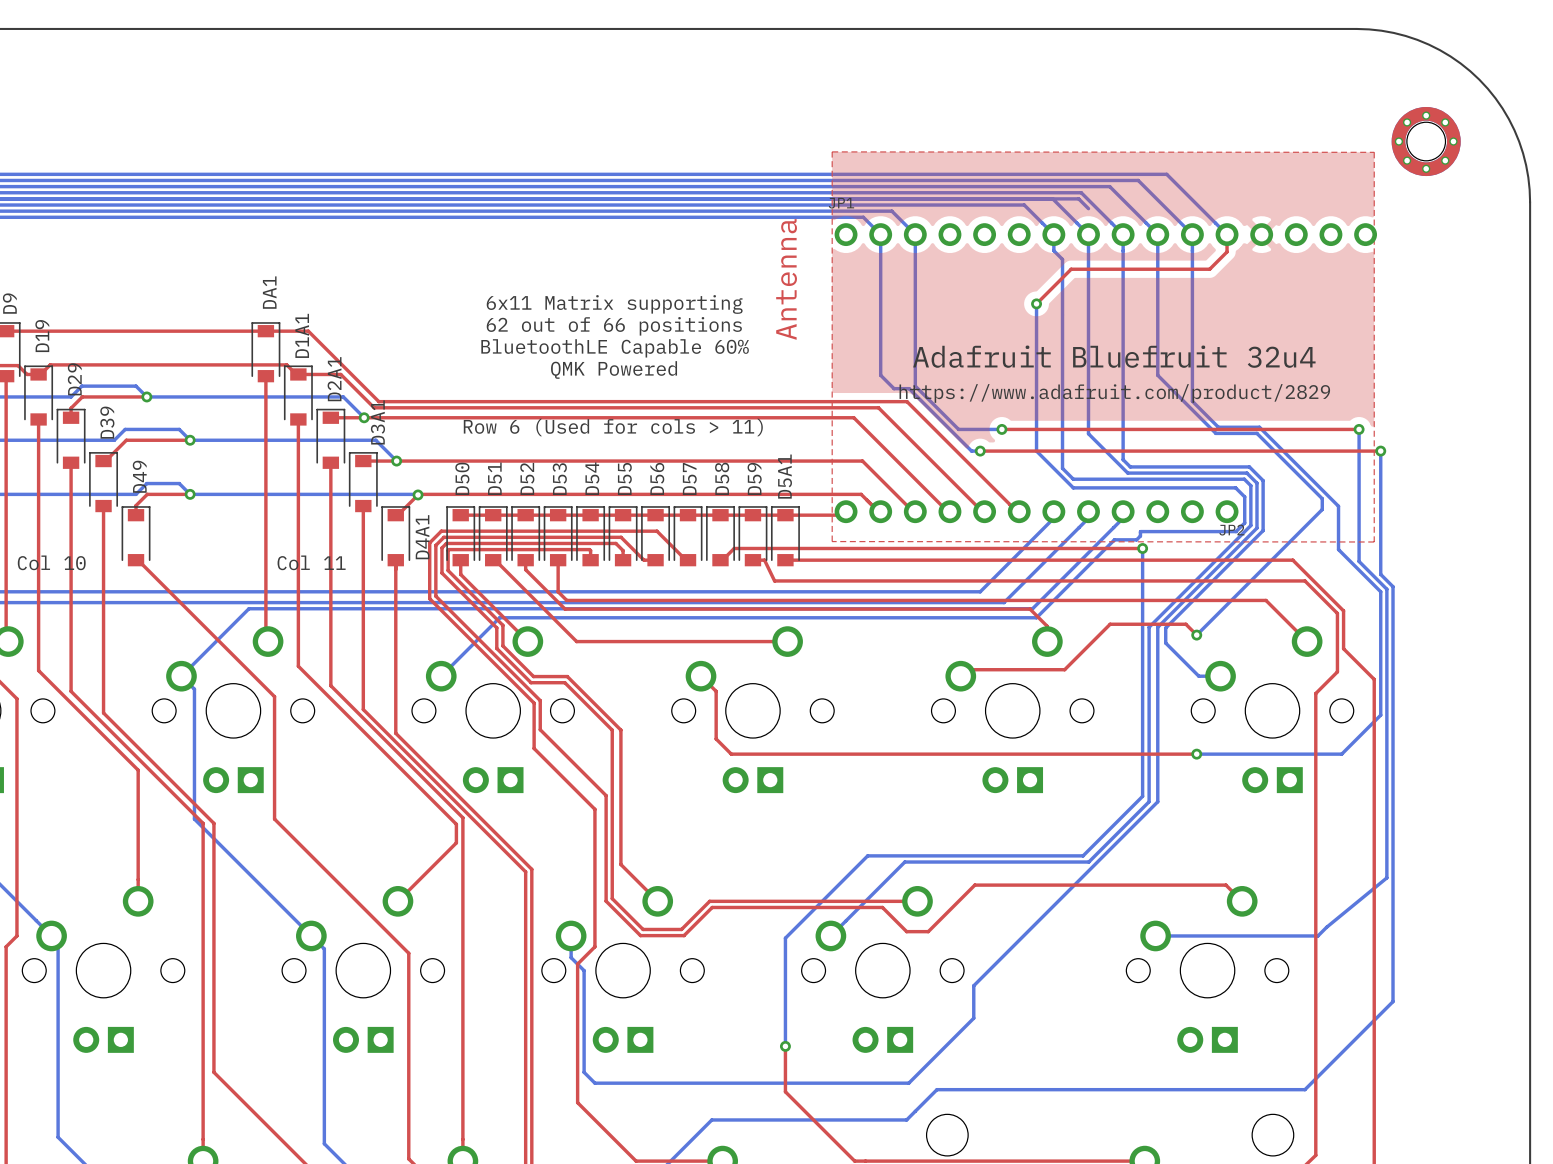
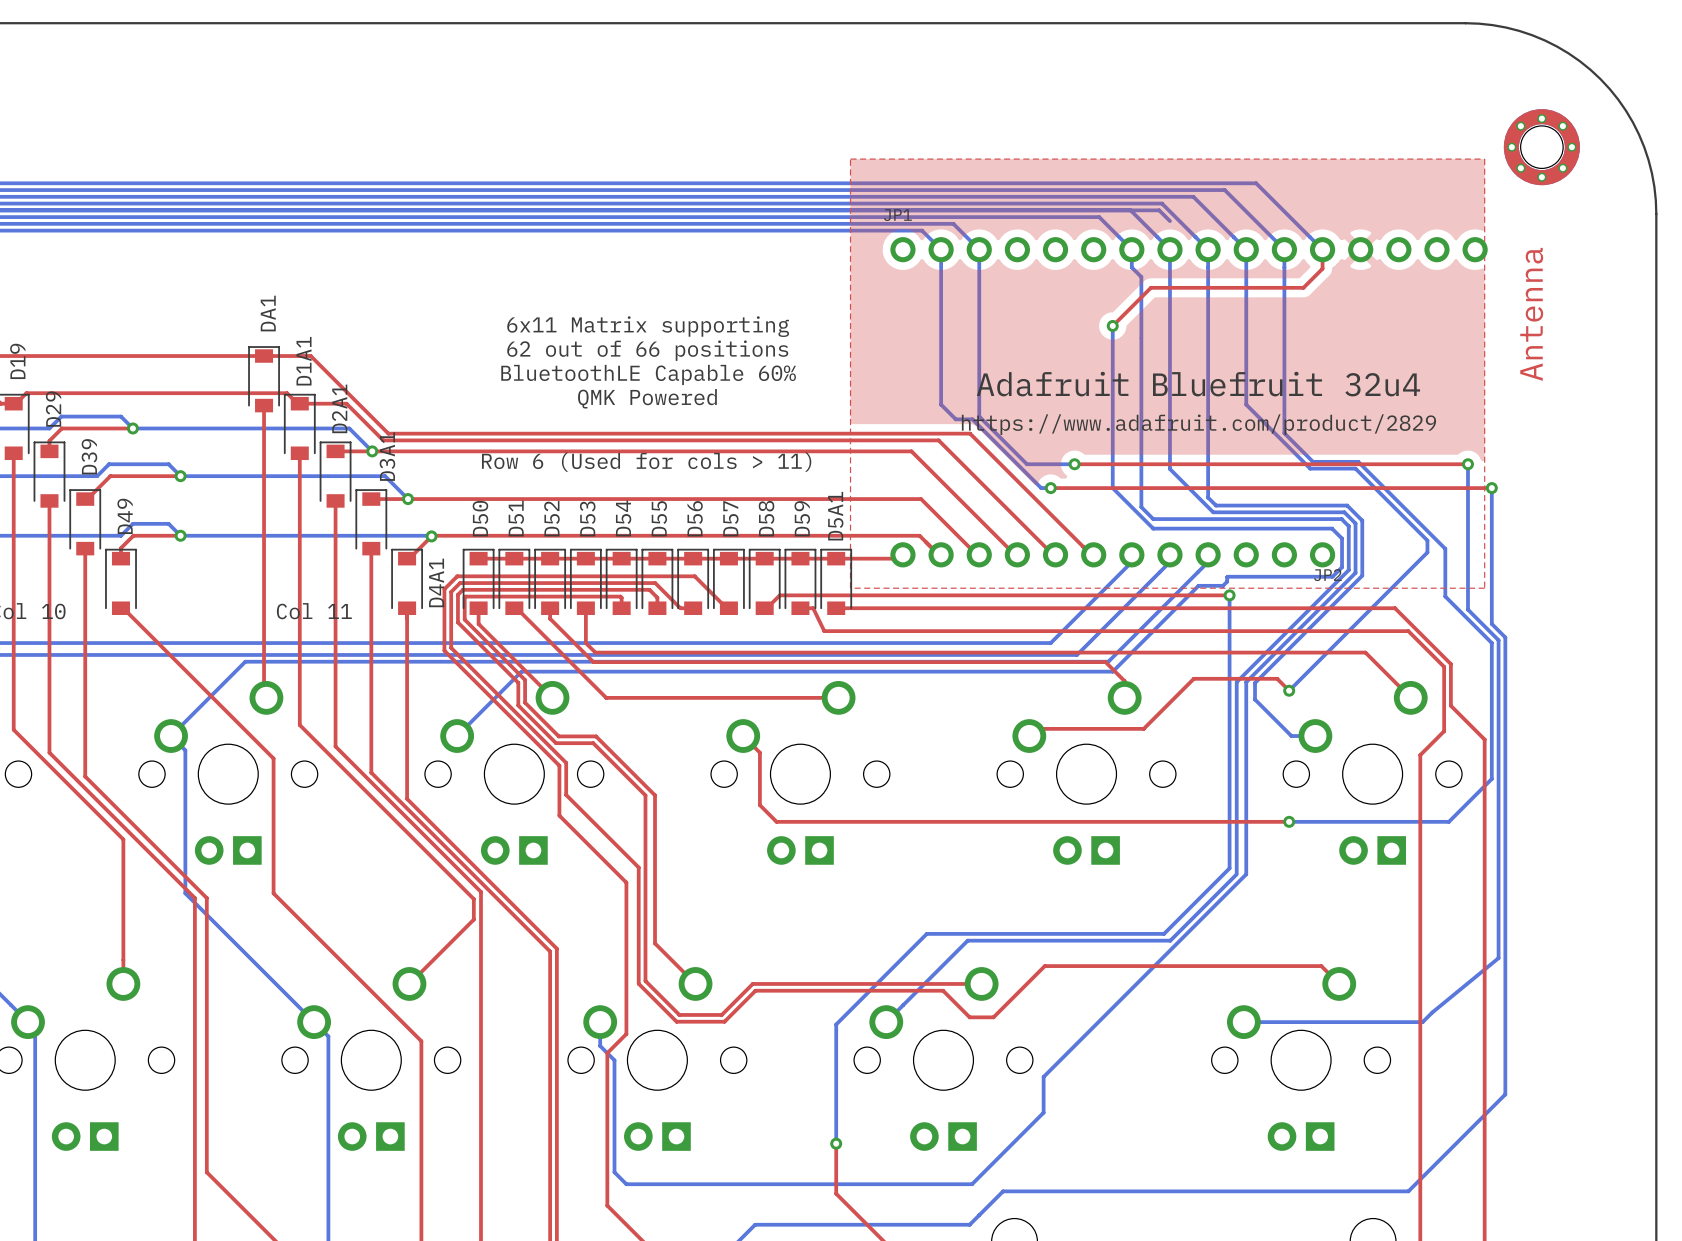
top zone outline: (1374, 152) (832, 151) (832, 541) (1374, 542) -> (1484, 159) (850, 159) (850, 588) (1484, 588)
text: Antenna (786, 279) -> none
text: none -> Antenna (1531, 314)

